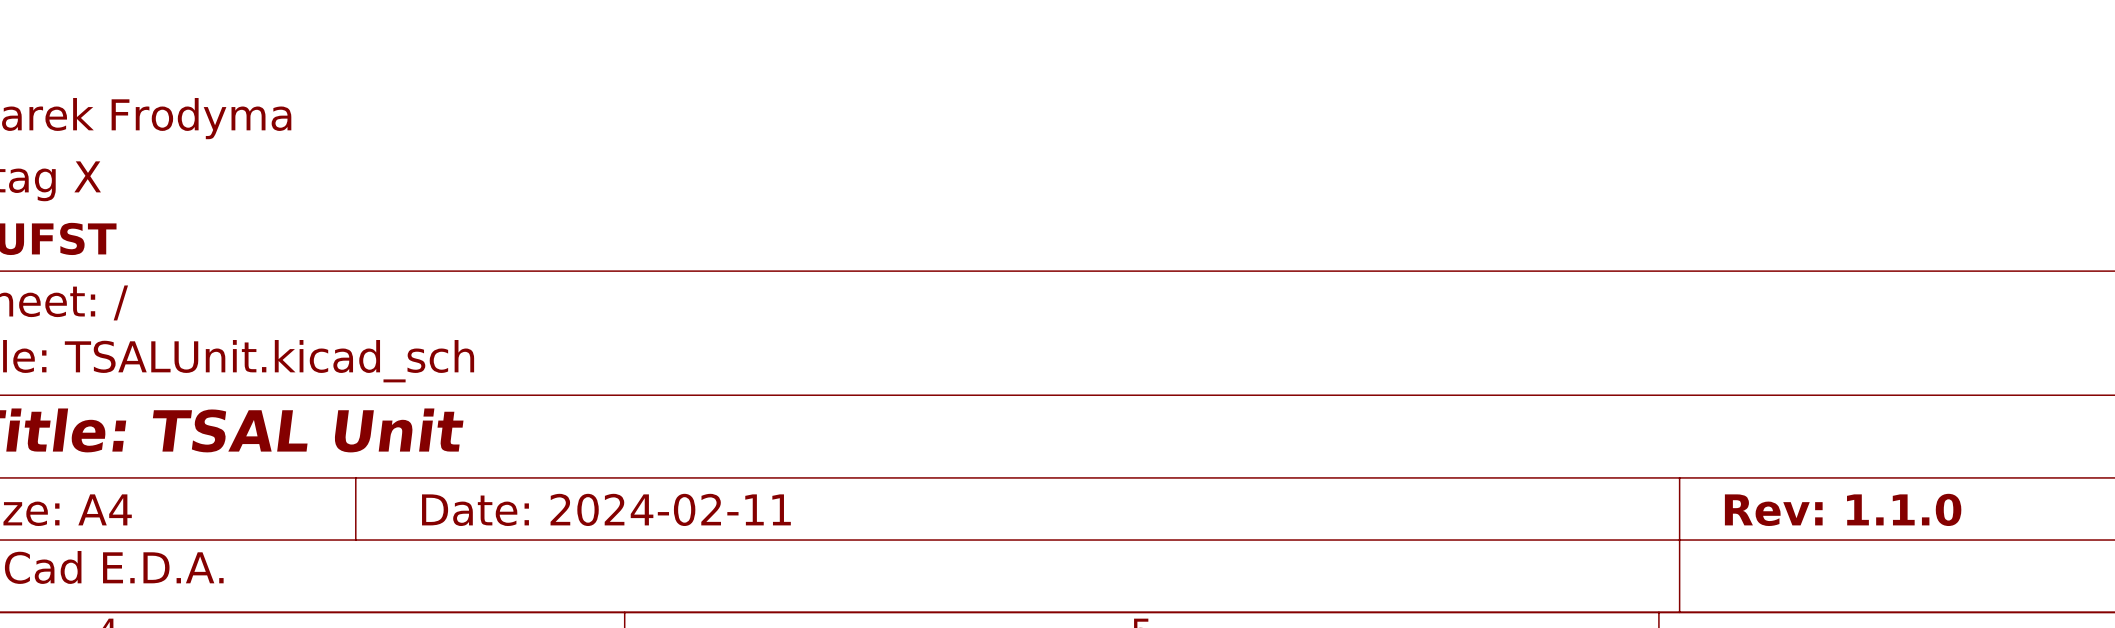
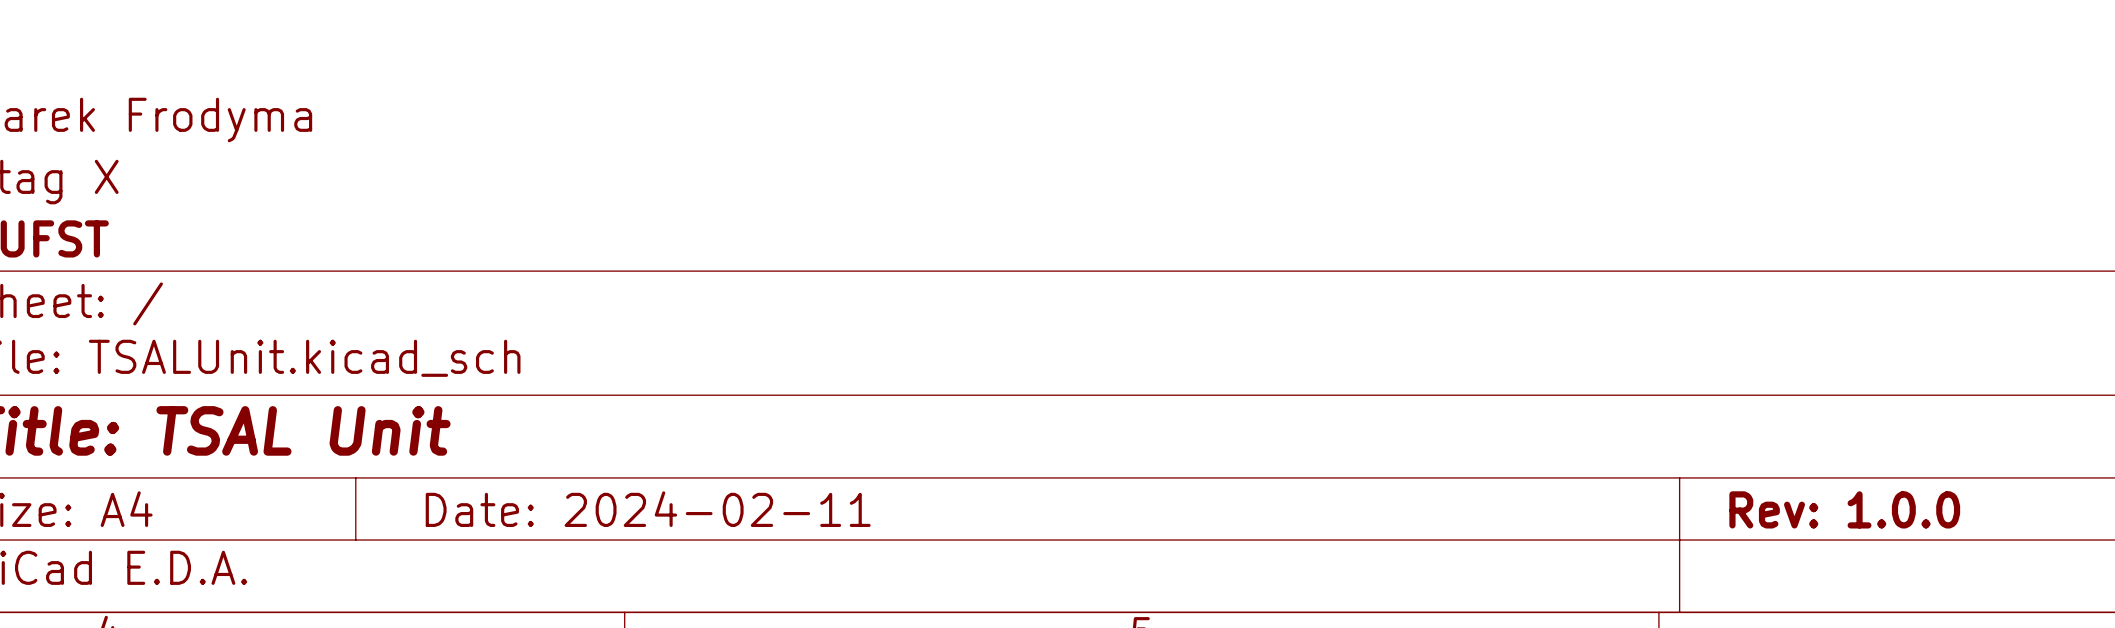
title block: Rev: 1.1.0 (1843, 509) -> Rev: 1.0.0 (1844, 509)

